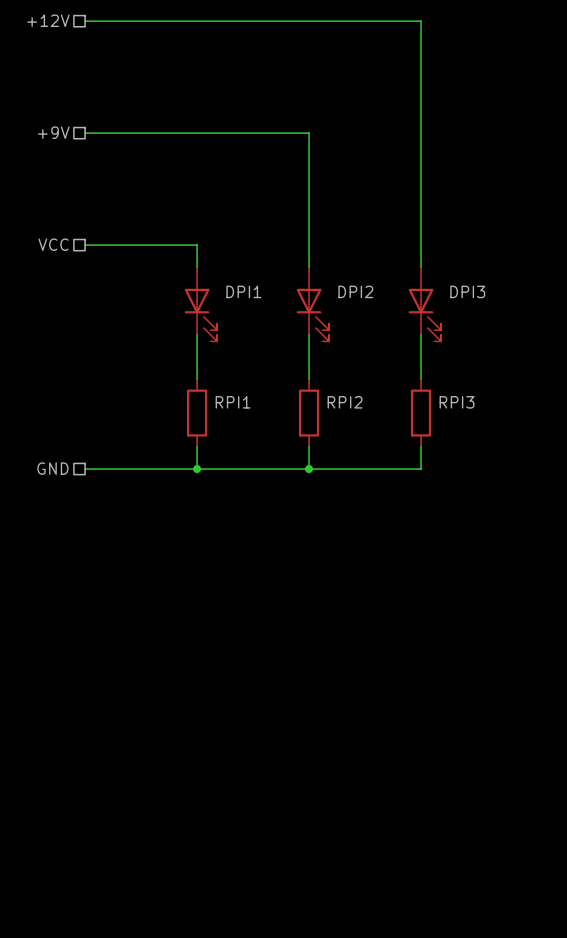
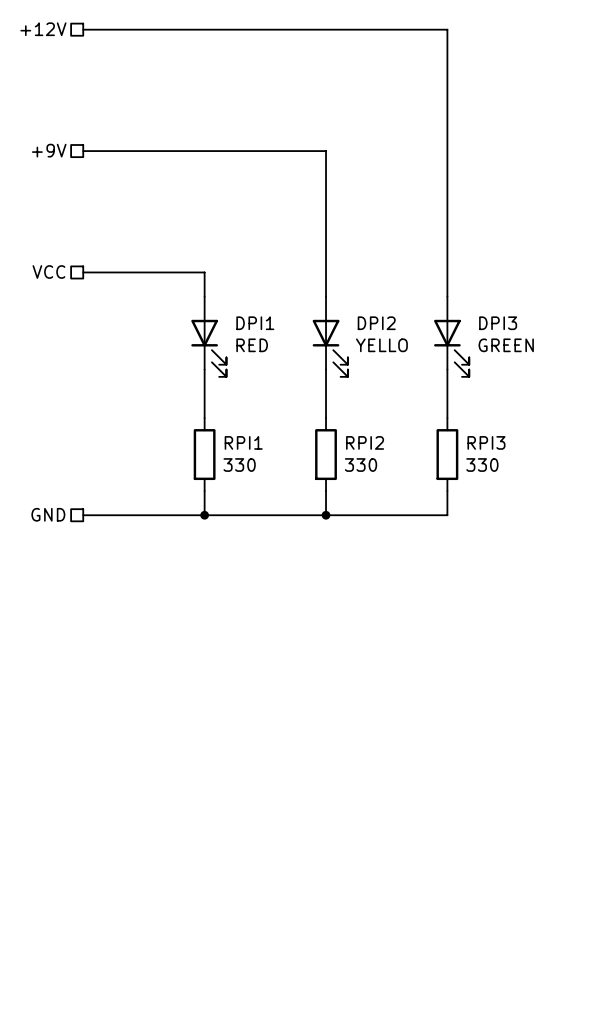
DPI1 value: none -> RED (252, 345)
DPI2 value: none -> YELLO (381, 345)
DPI3 value: none -> GREEN (506, 345)
RPI1 value: none -> 330 (239, 465)
RPI2 value: none -> 330 (361, 465)
RPI3 value: none -> 330 (482, 465)

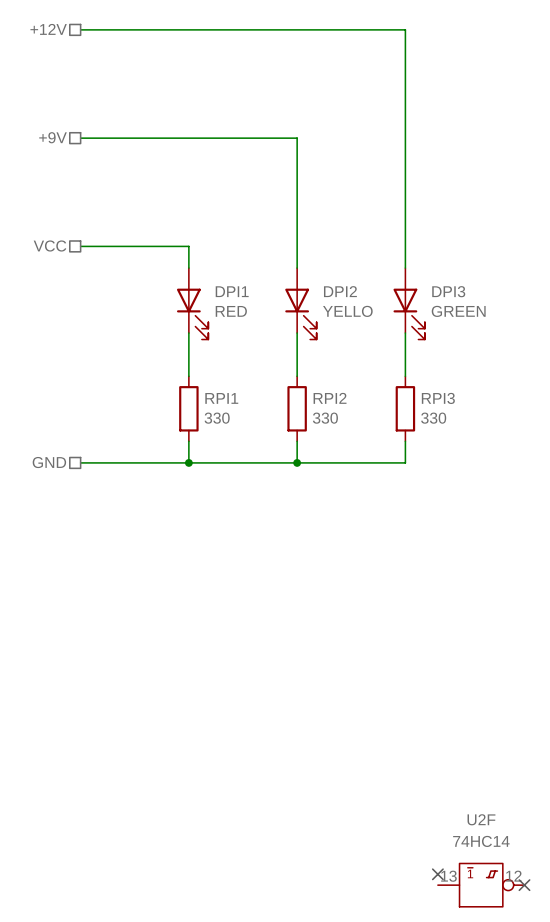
no-connect mark: none -> (437, 874)
U2F: none -> 74HC14 (481, 885)
no-connect mark: none -> (524, 885)

